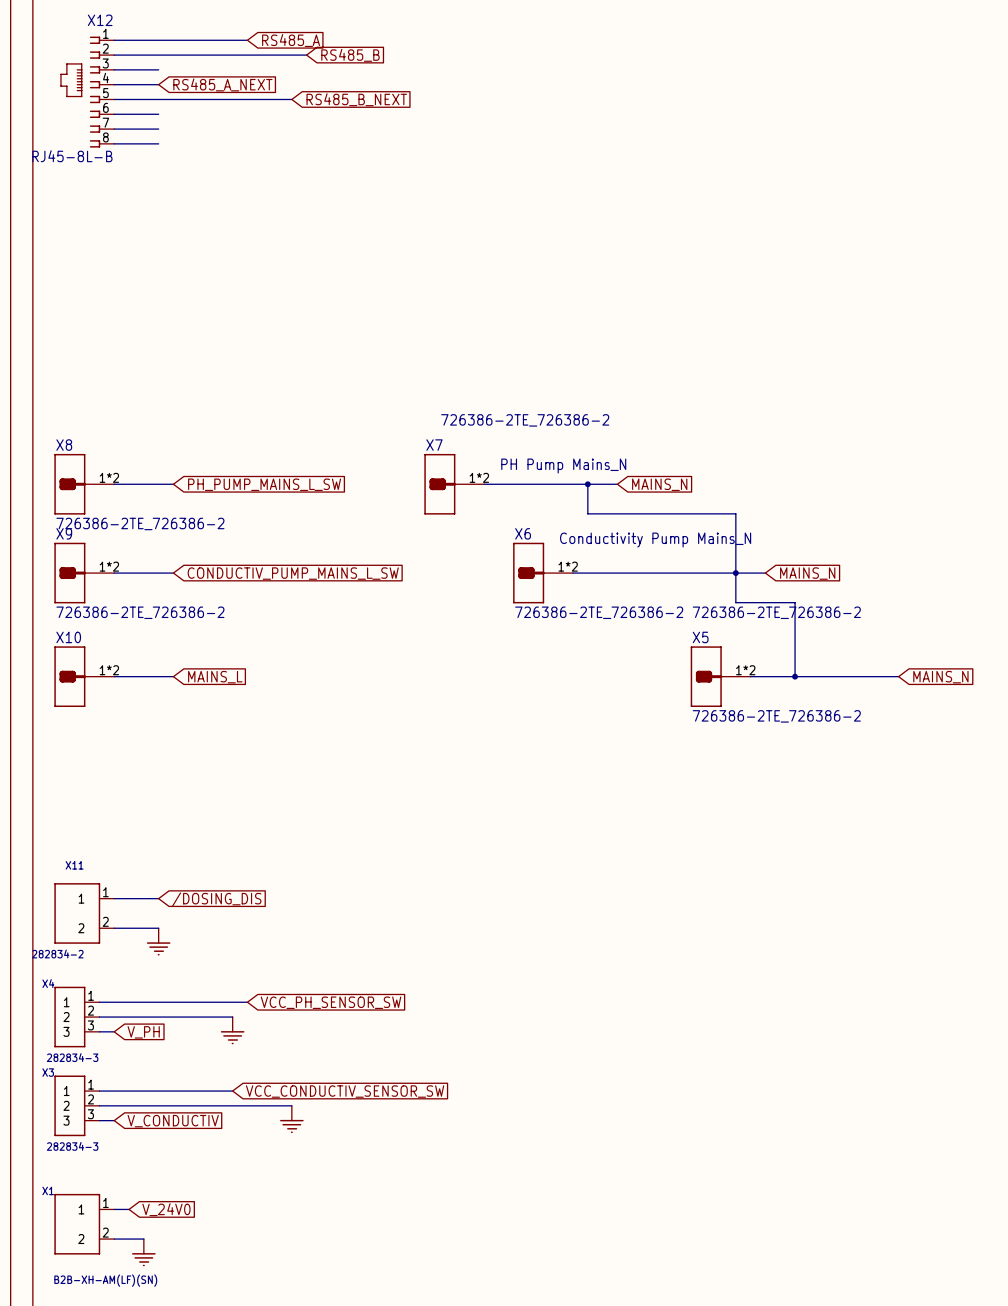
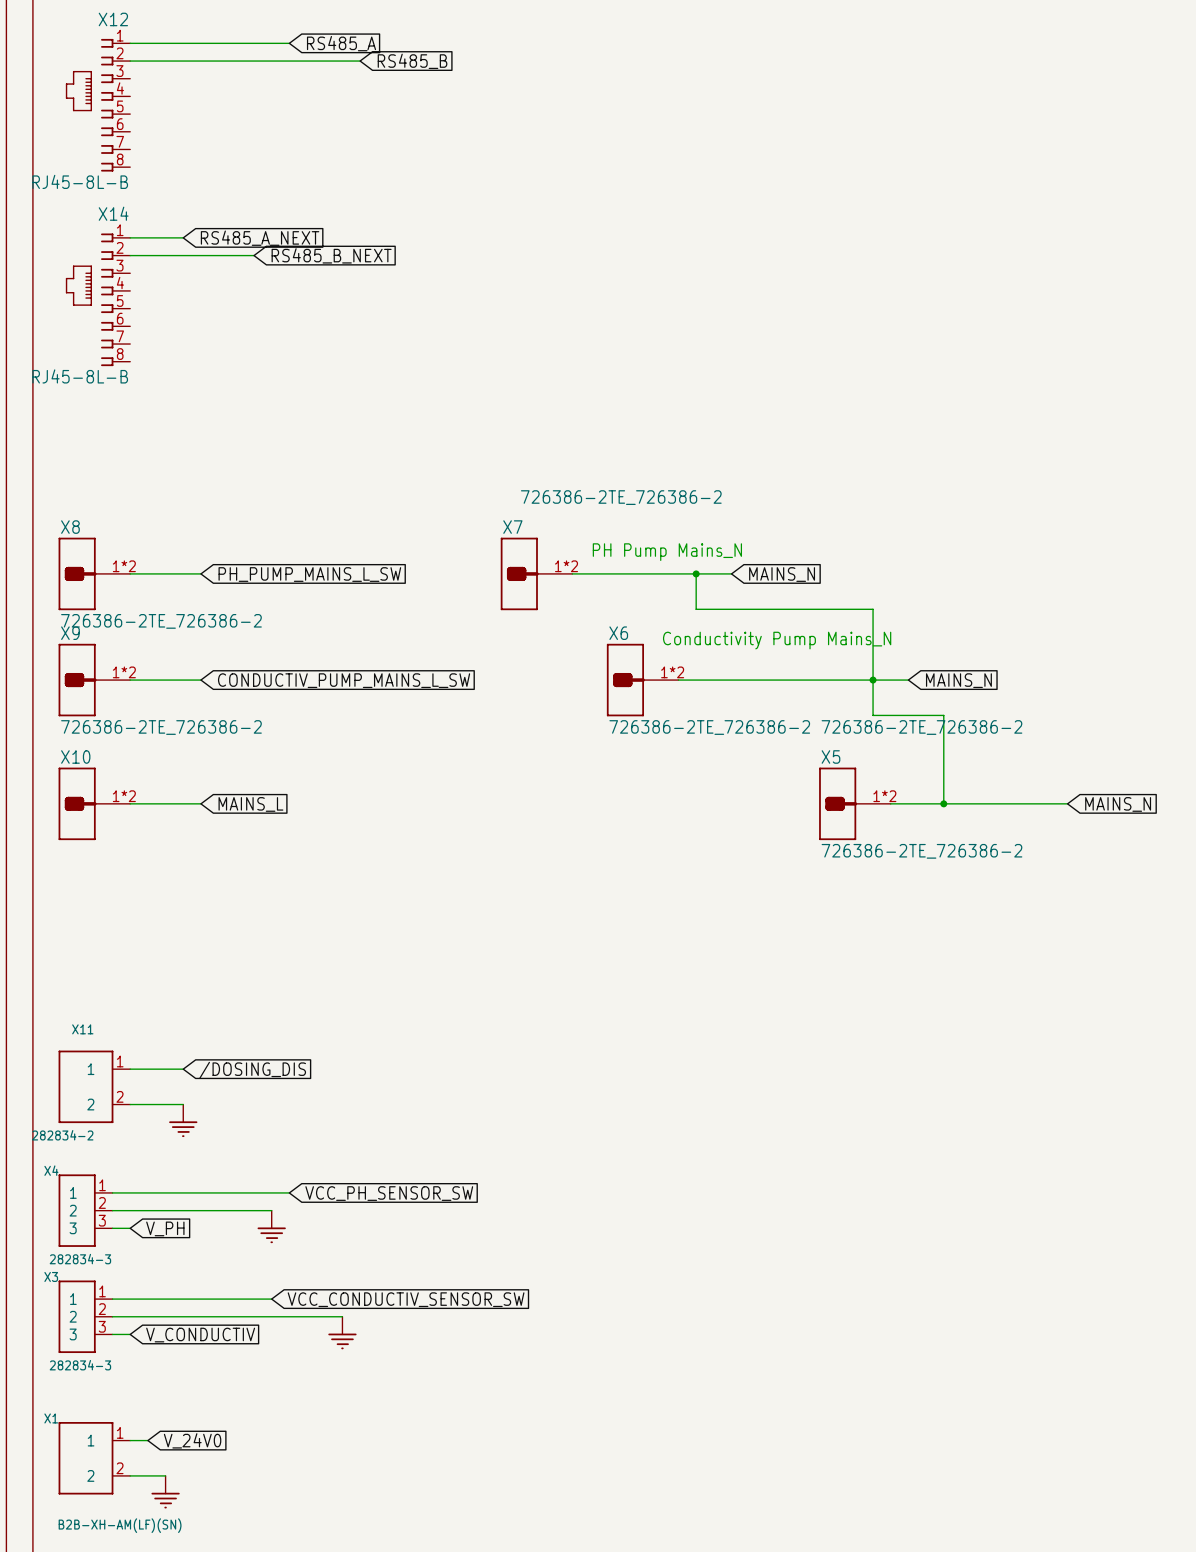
wire: (114, 69) (158, 69) -> none
wire: (114, 84) (158, 84) -> none
global label position: RS485_A_NEXT (222, 84) -> RS485_A_NEXT (260, 238)
wire: (114, 99) (291, 99) -> none
global label position: RS485_B_NEXT (356, 99) -> RS485_B_NEXT (331, 255)
wire: (114, 114) (158, 114) -> none
wire: (114, 129) (158, 129) -> none
wire: (114, 143) (158, 143) -> (130, 237) (183, 237)
wire: none -> (130, 255) (254, 255)
X14: none -> RJ45-8L-B (98, 299)

